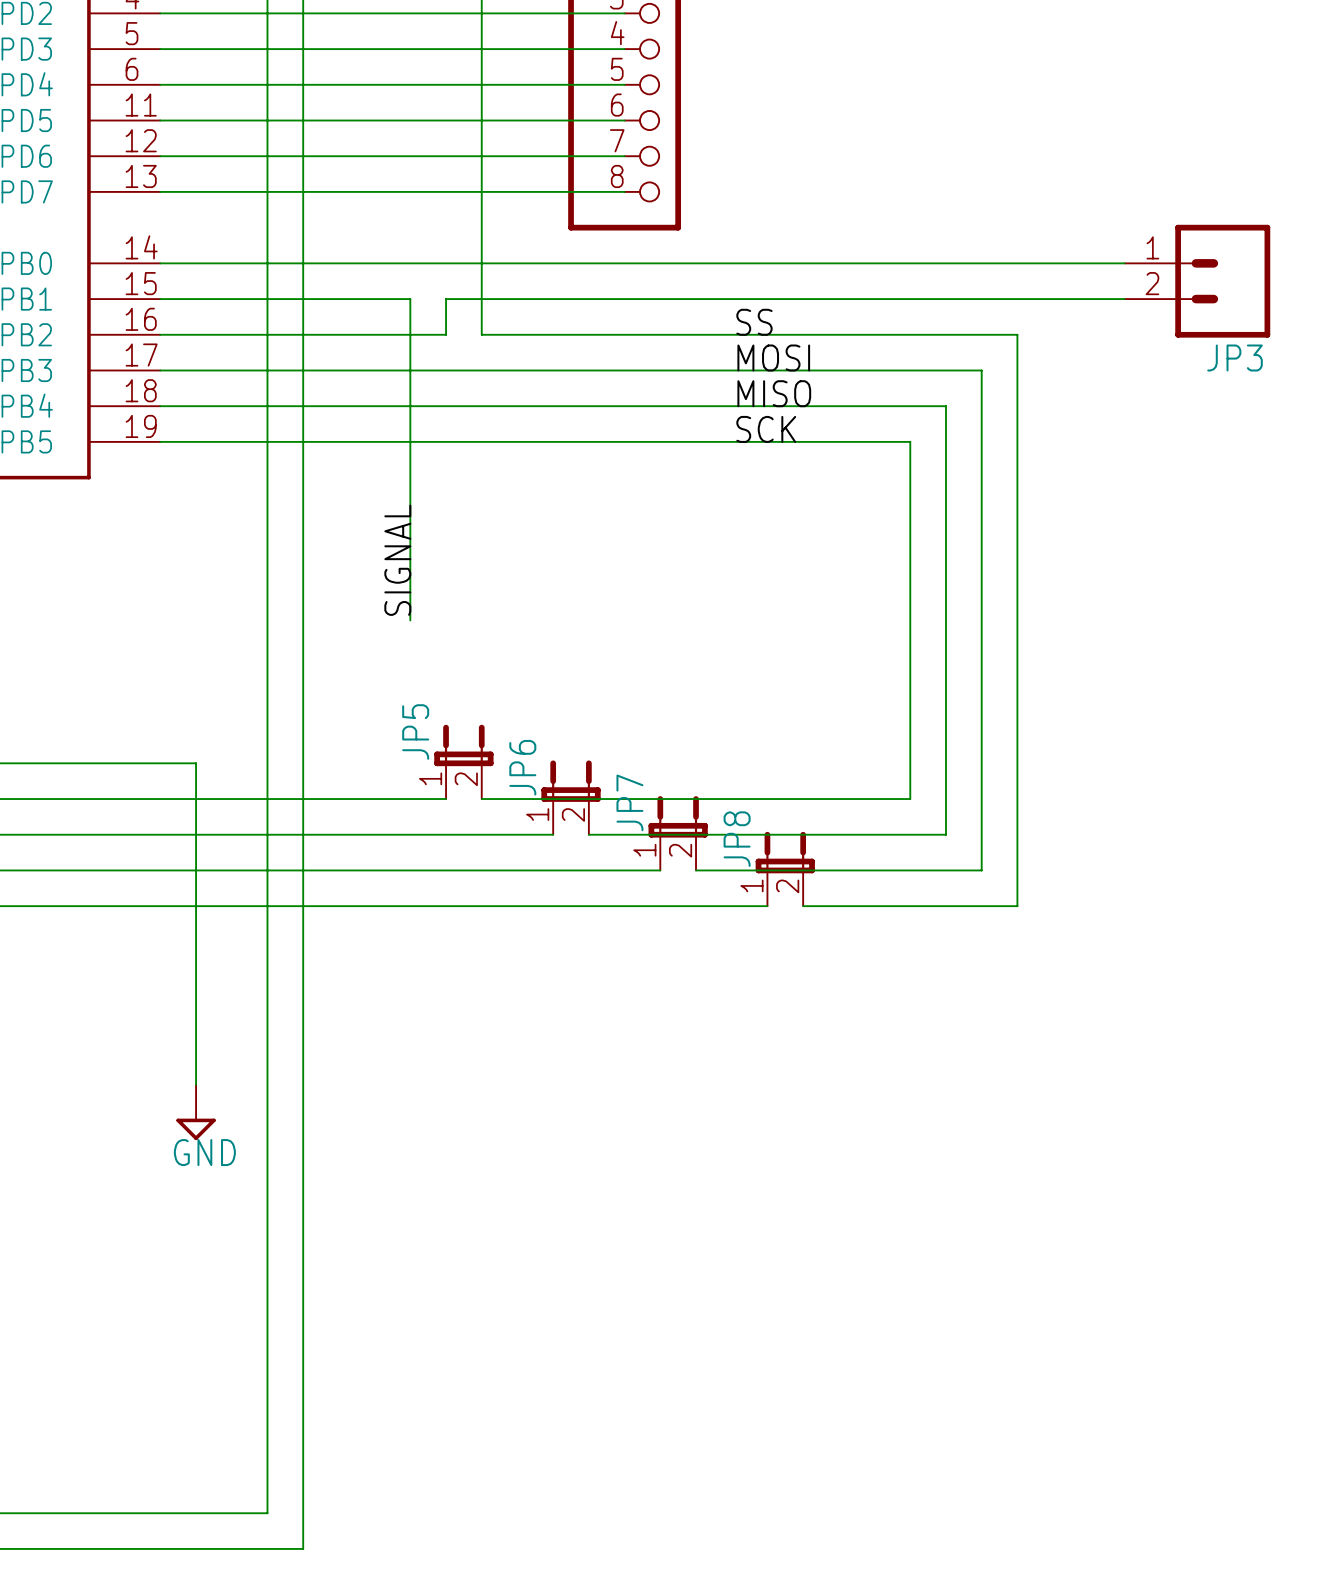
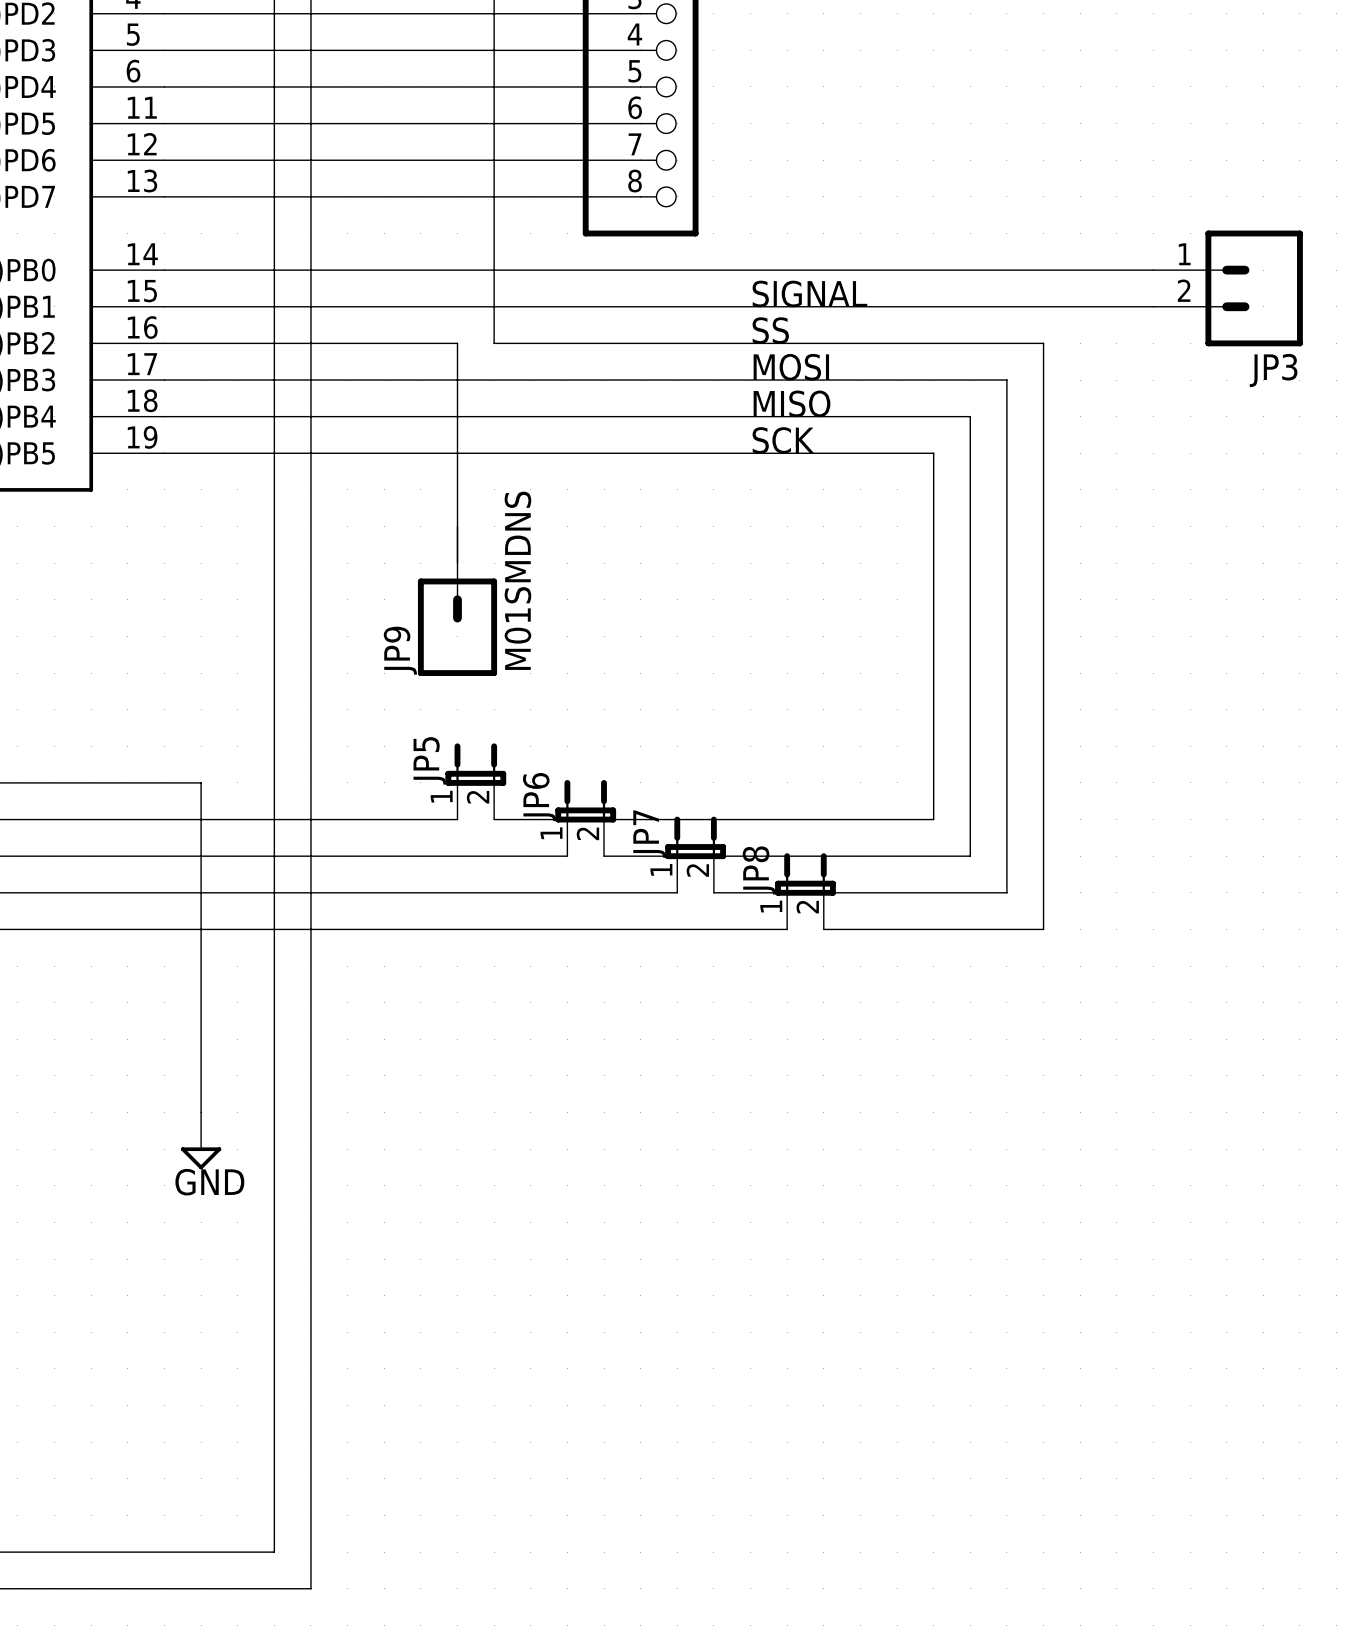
label: none -> SIGNAL (809, 293)
wire: (410, 299) (410, 620) -> none
wire: (446, 299) (446, 334) -> (457, 306) (420, 306)
wire: none -> (457, 343) (457, 563)
label: SIGNAL (397, 560) -> none
JP9: none -> M01SMDNS (457, 601)

